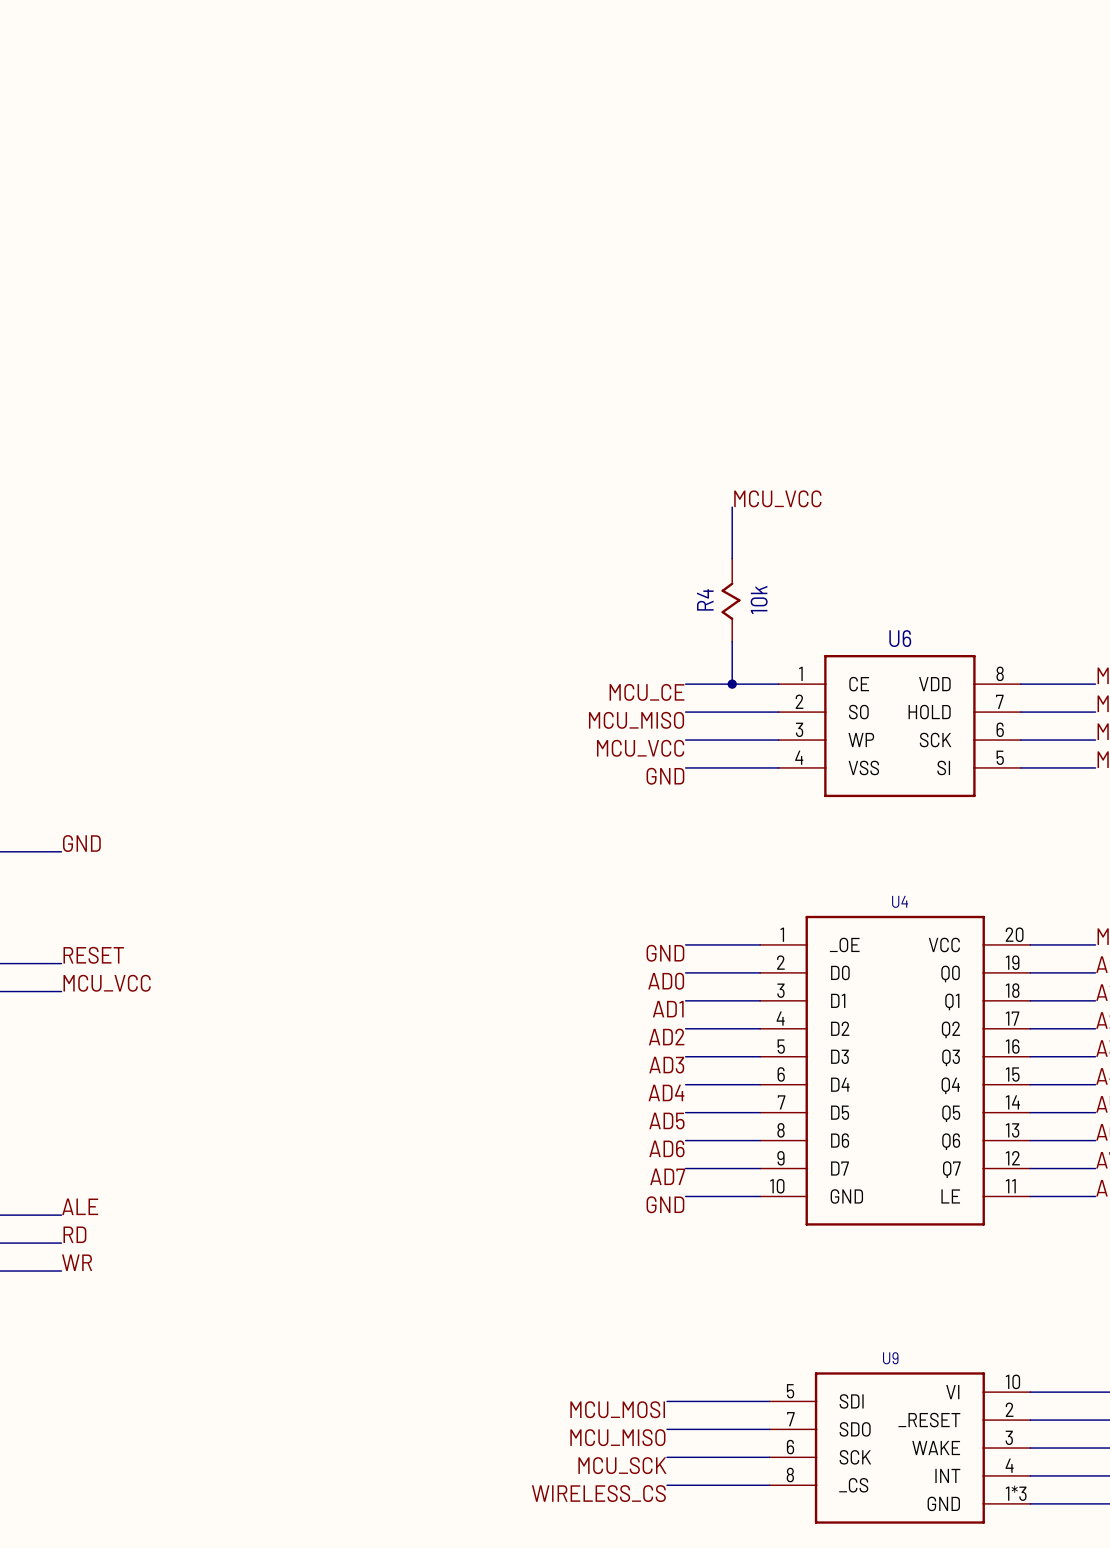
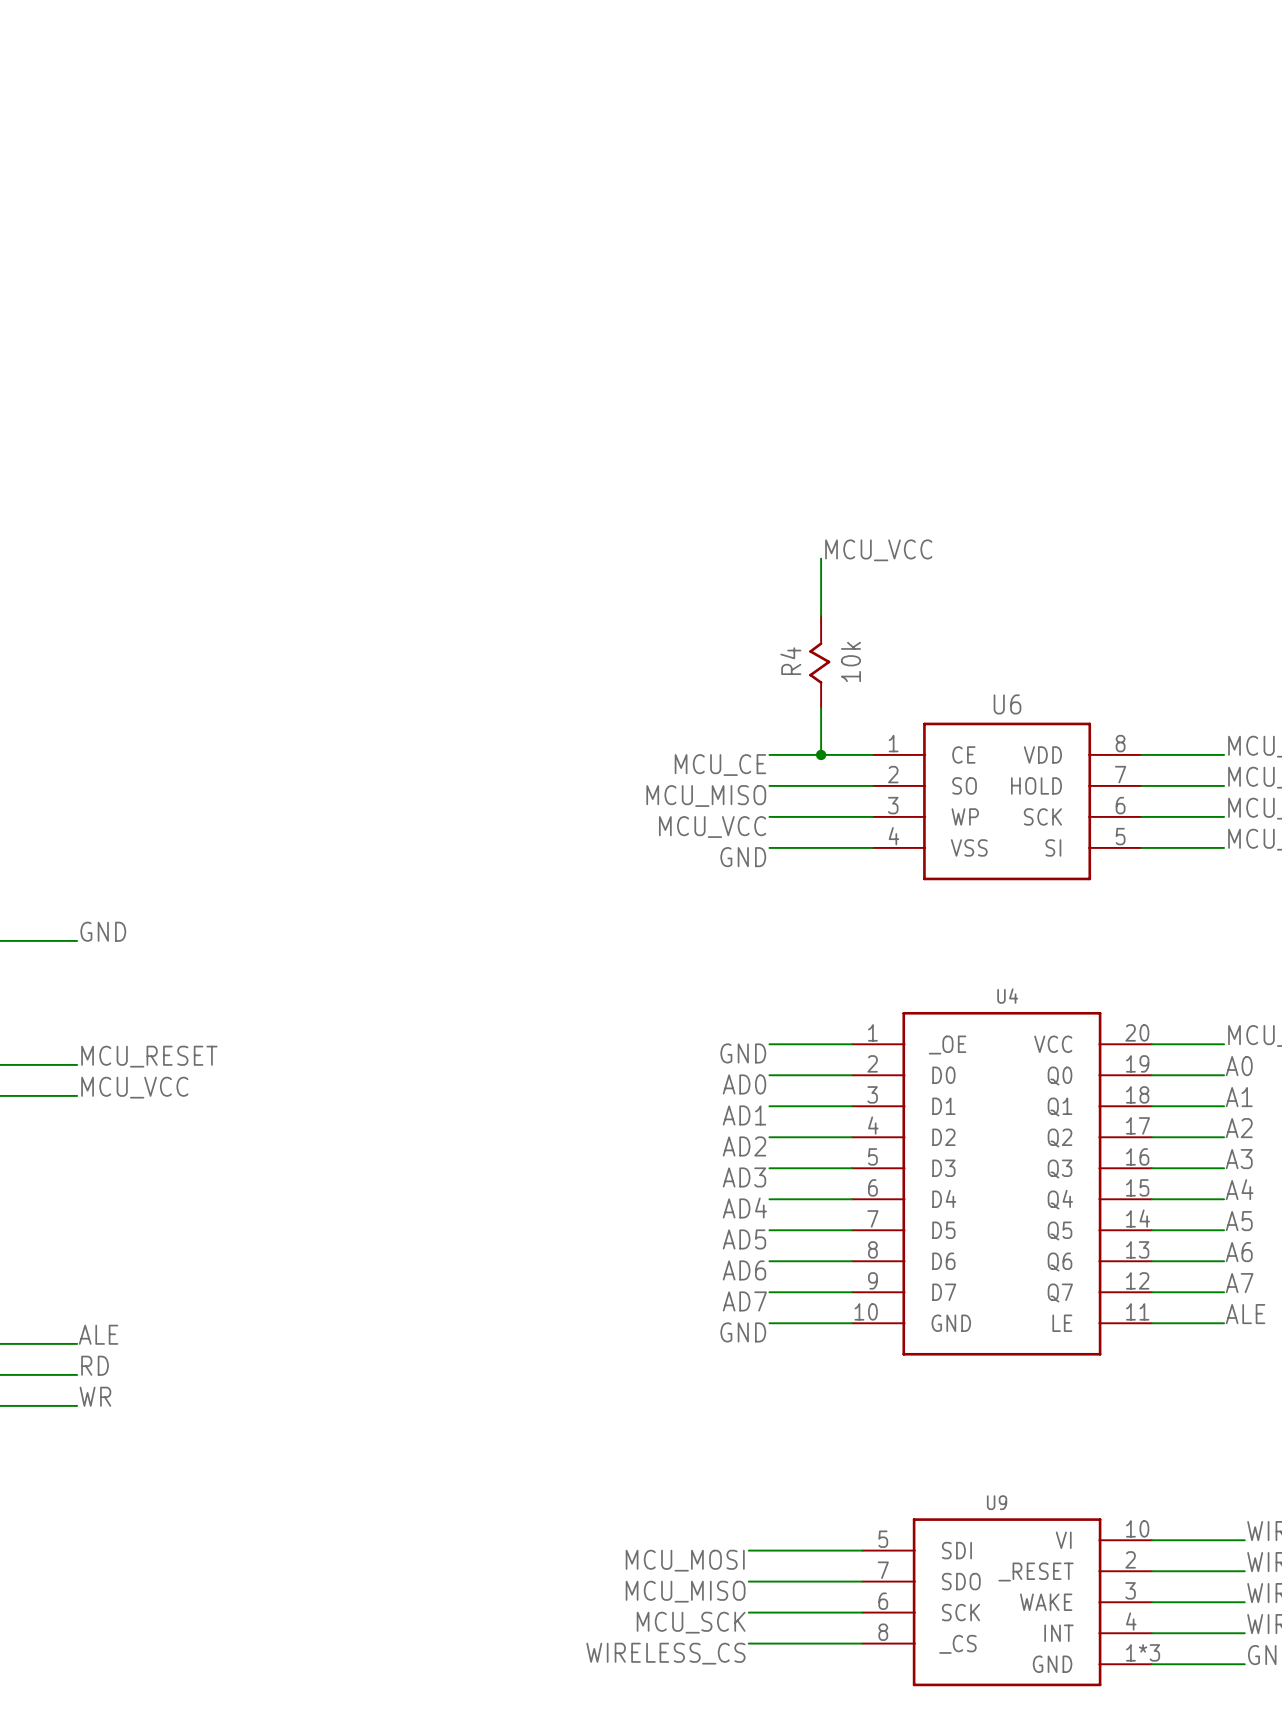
label: RESET (93, 955) -> MCU_RESET (149, 1056)

